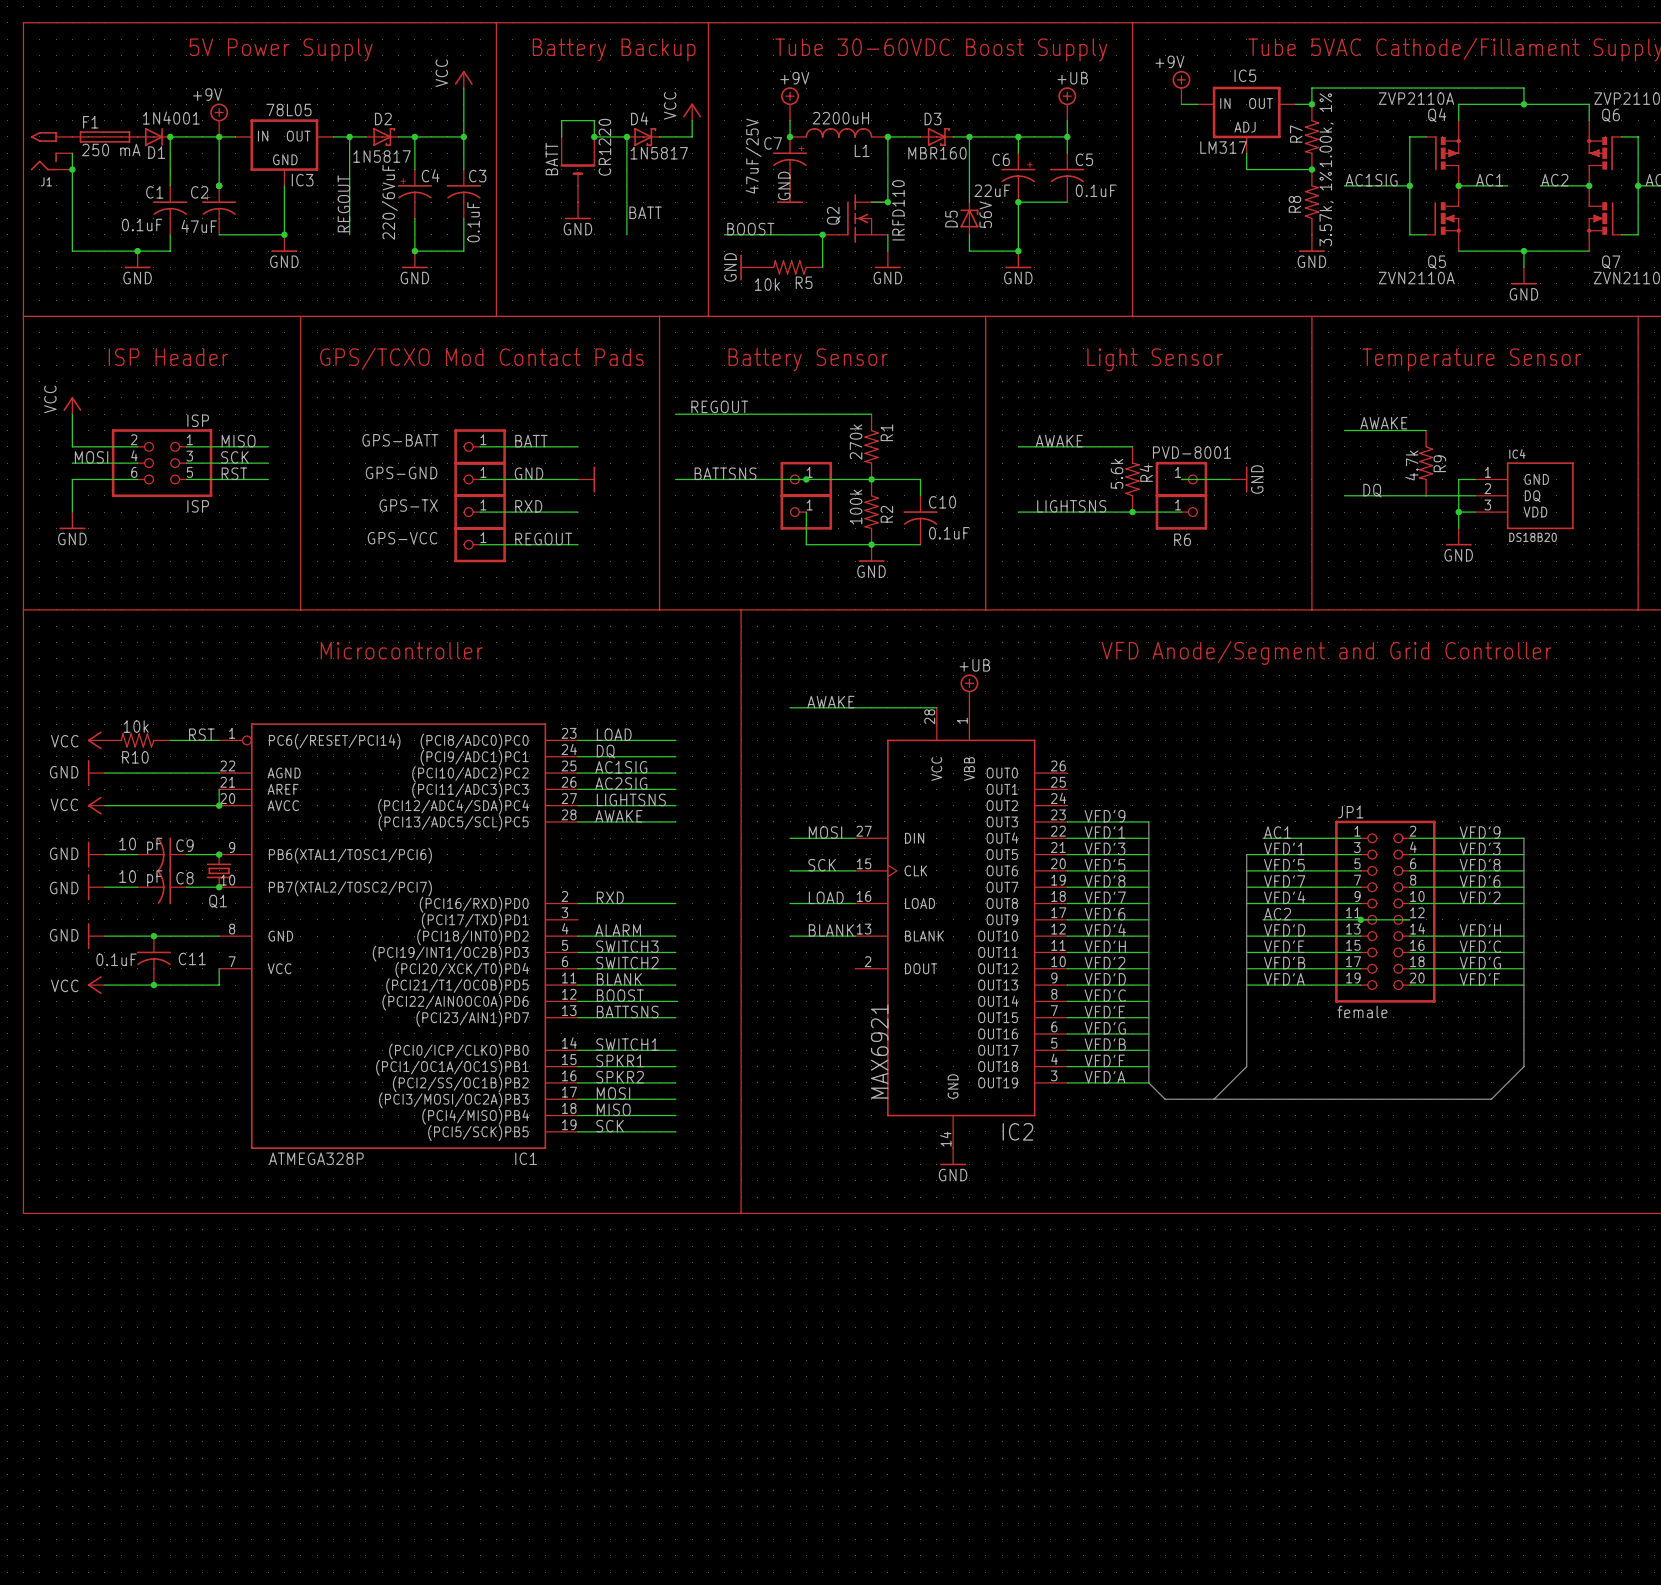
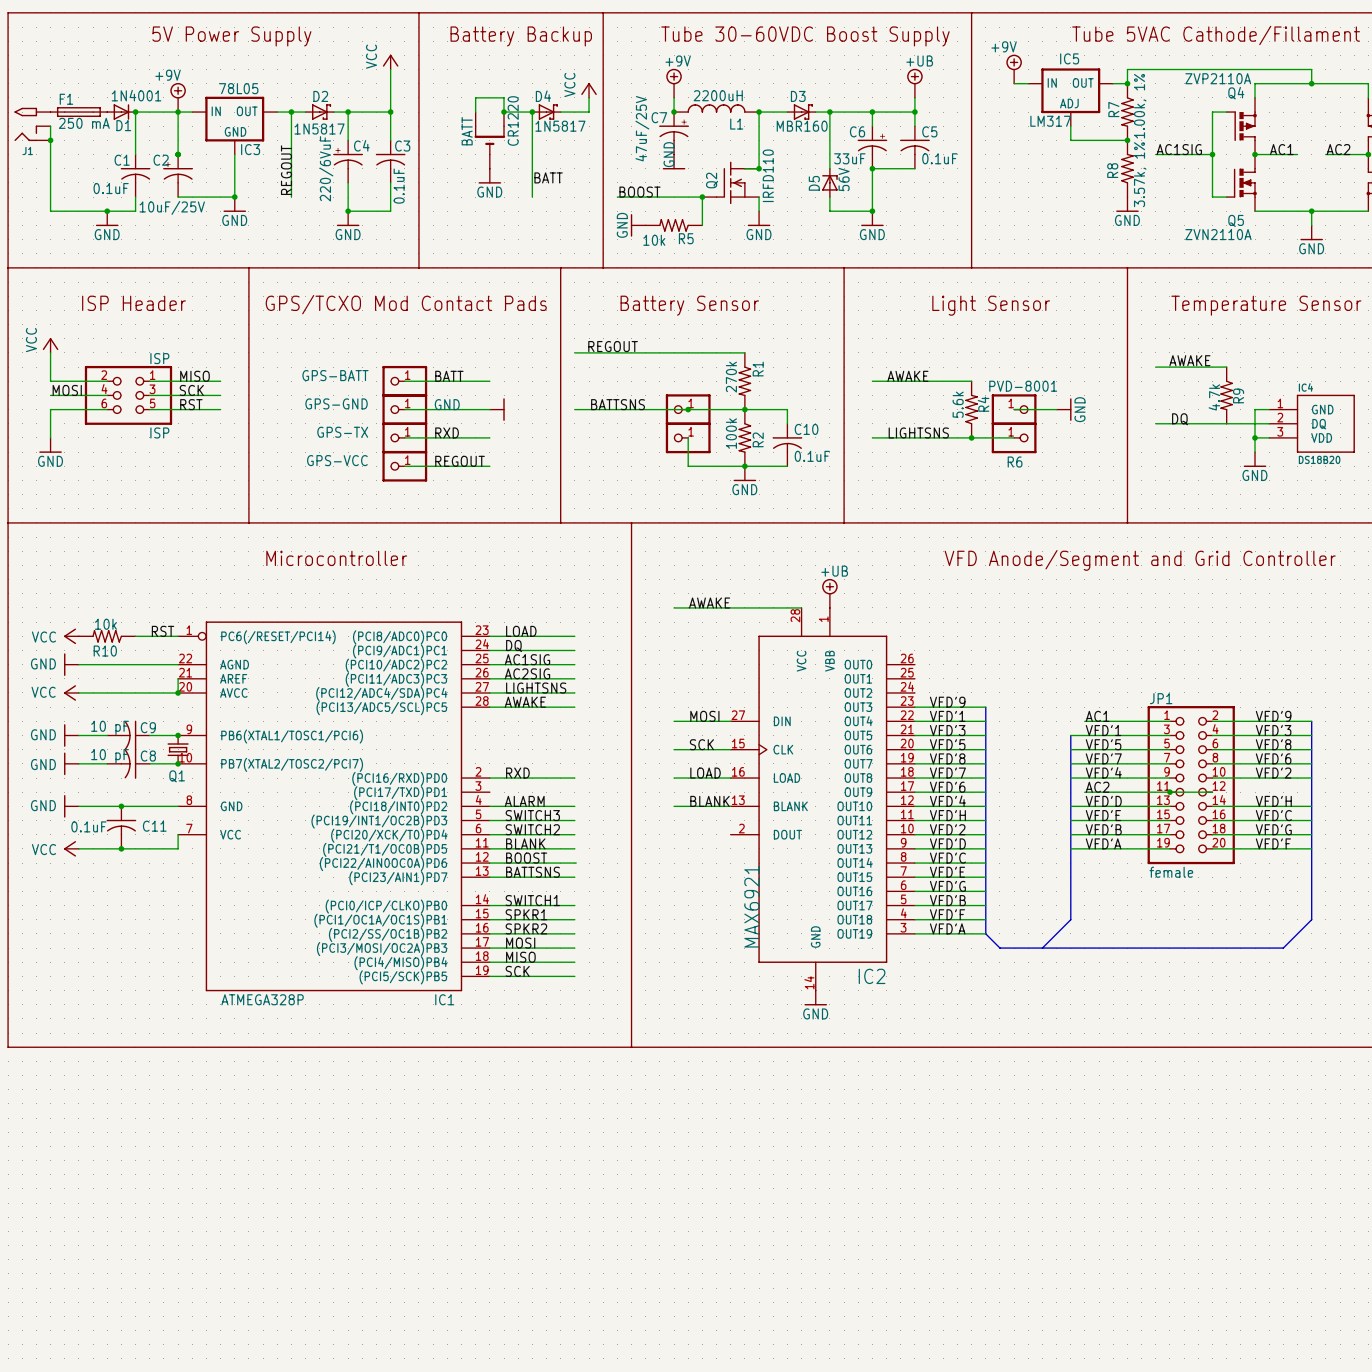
C6 value: 22uF (992, 190) -> 33uF (849, 158)
C2 value: 47uF (199, 226) -> 10uF/25V (172, 207)

